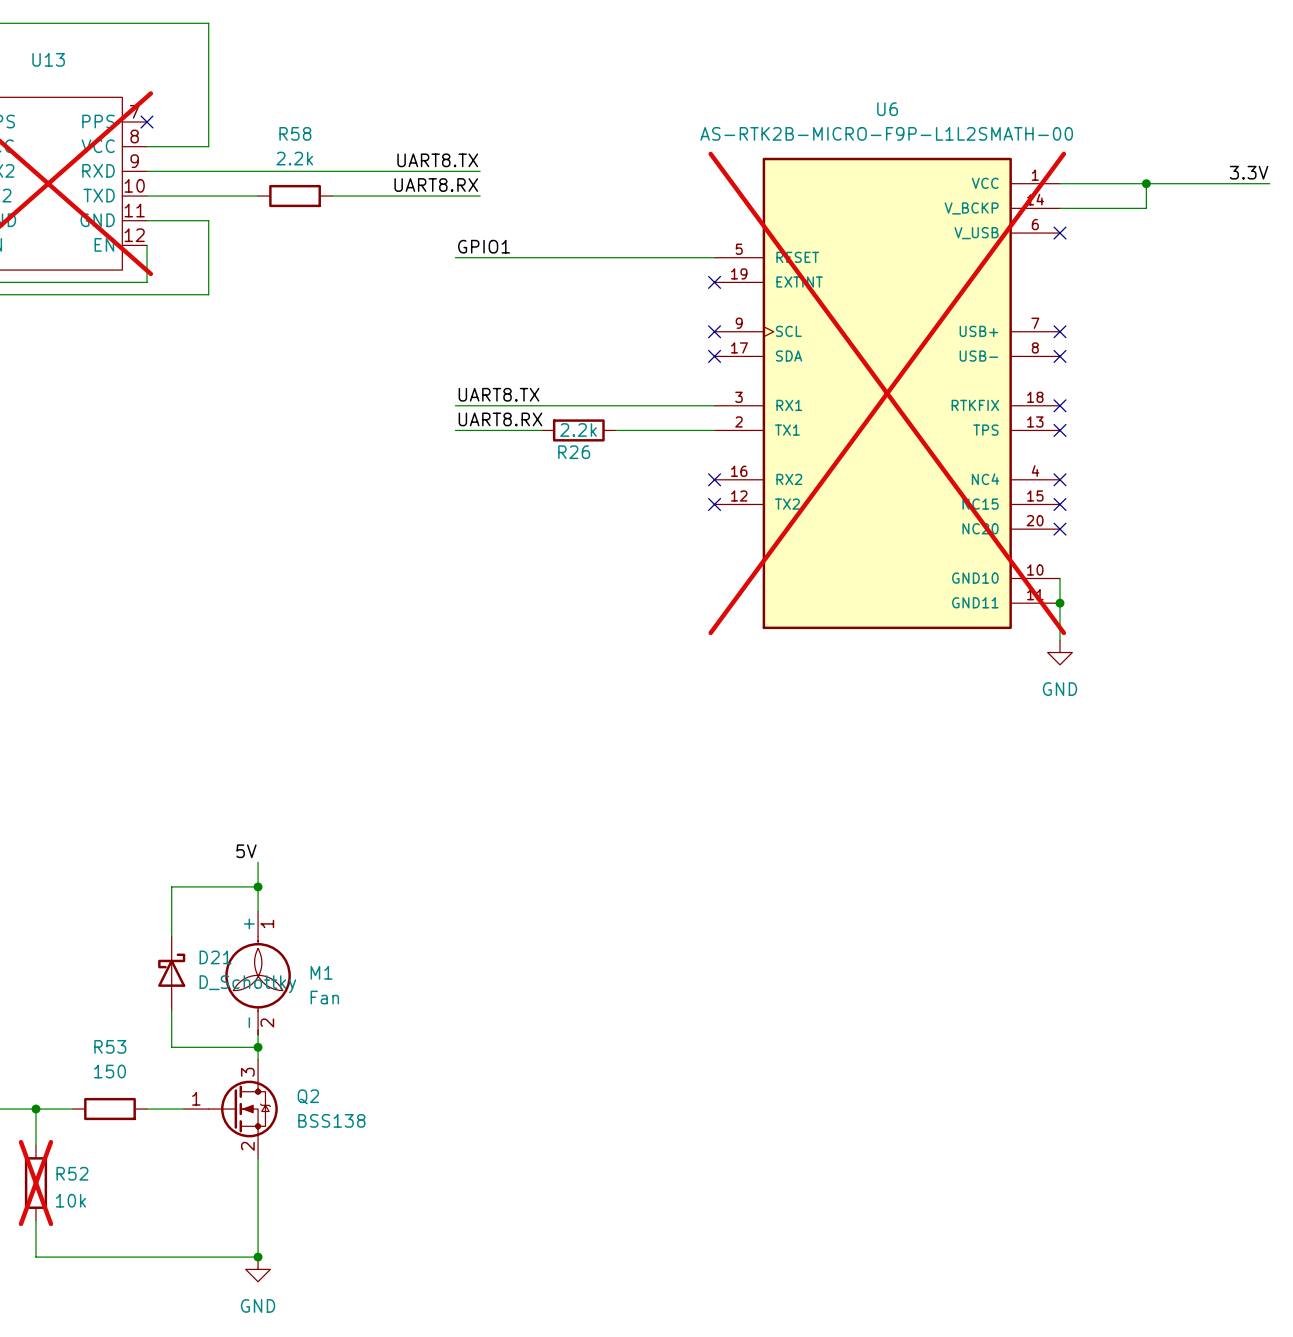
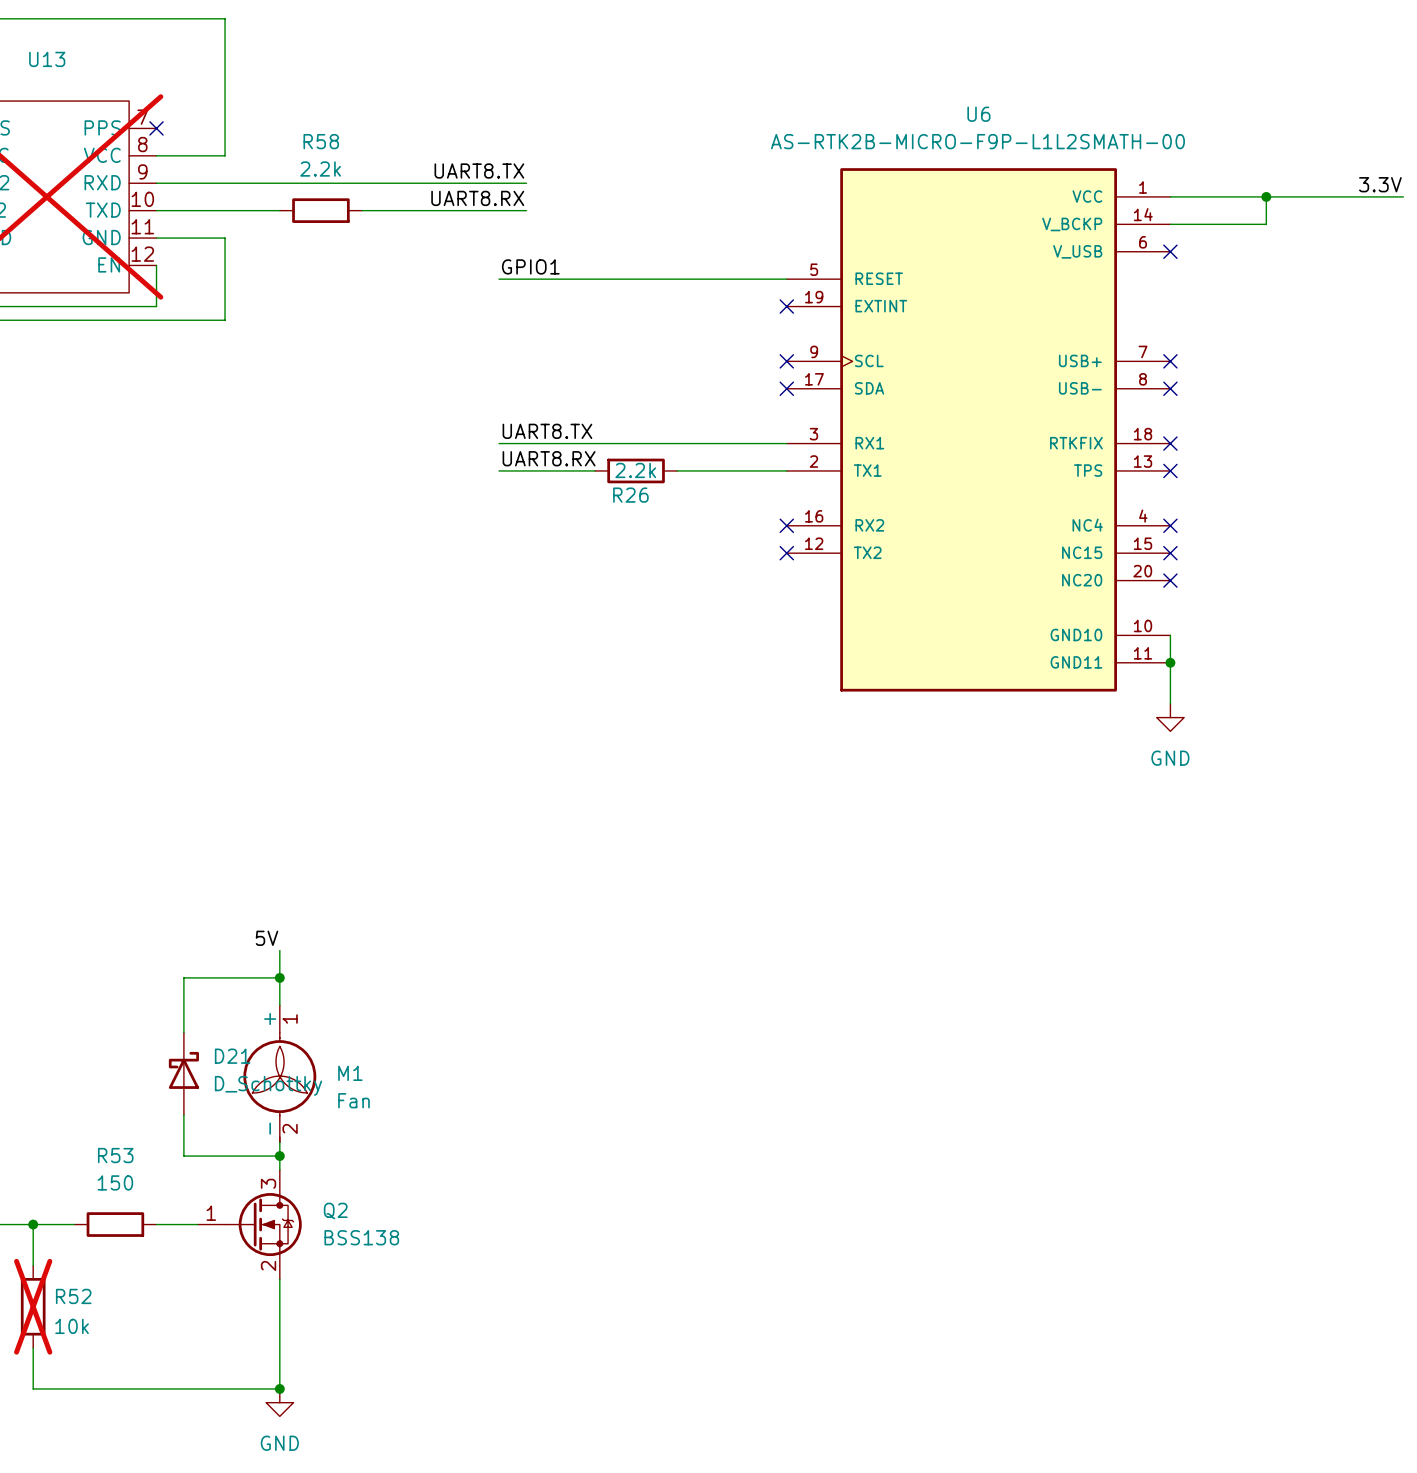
U6 do-not-place cross: (887, 393) -> none

